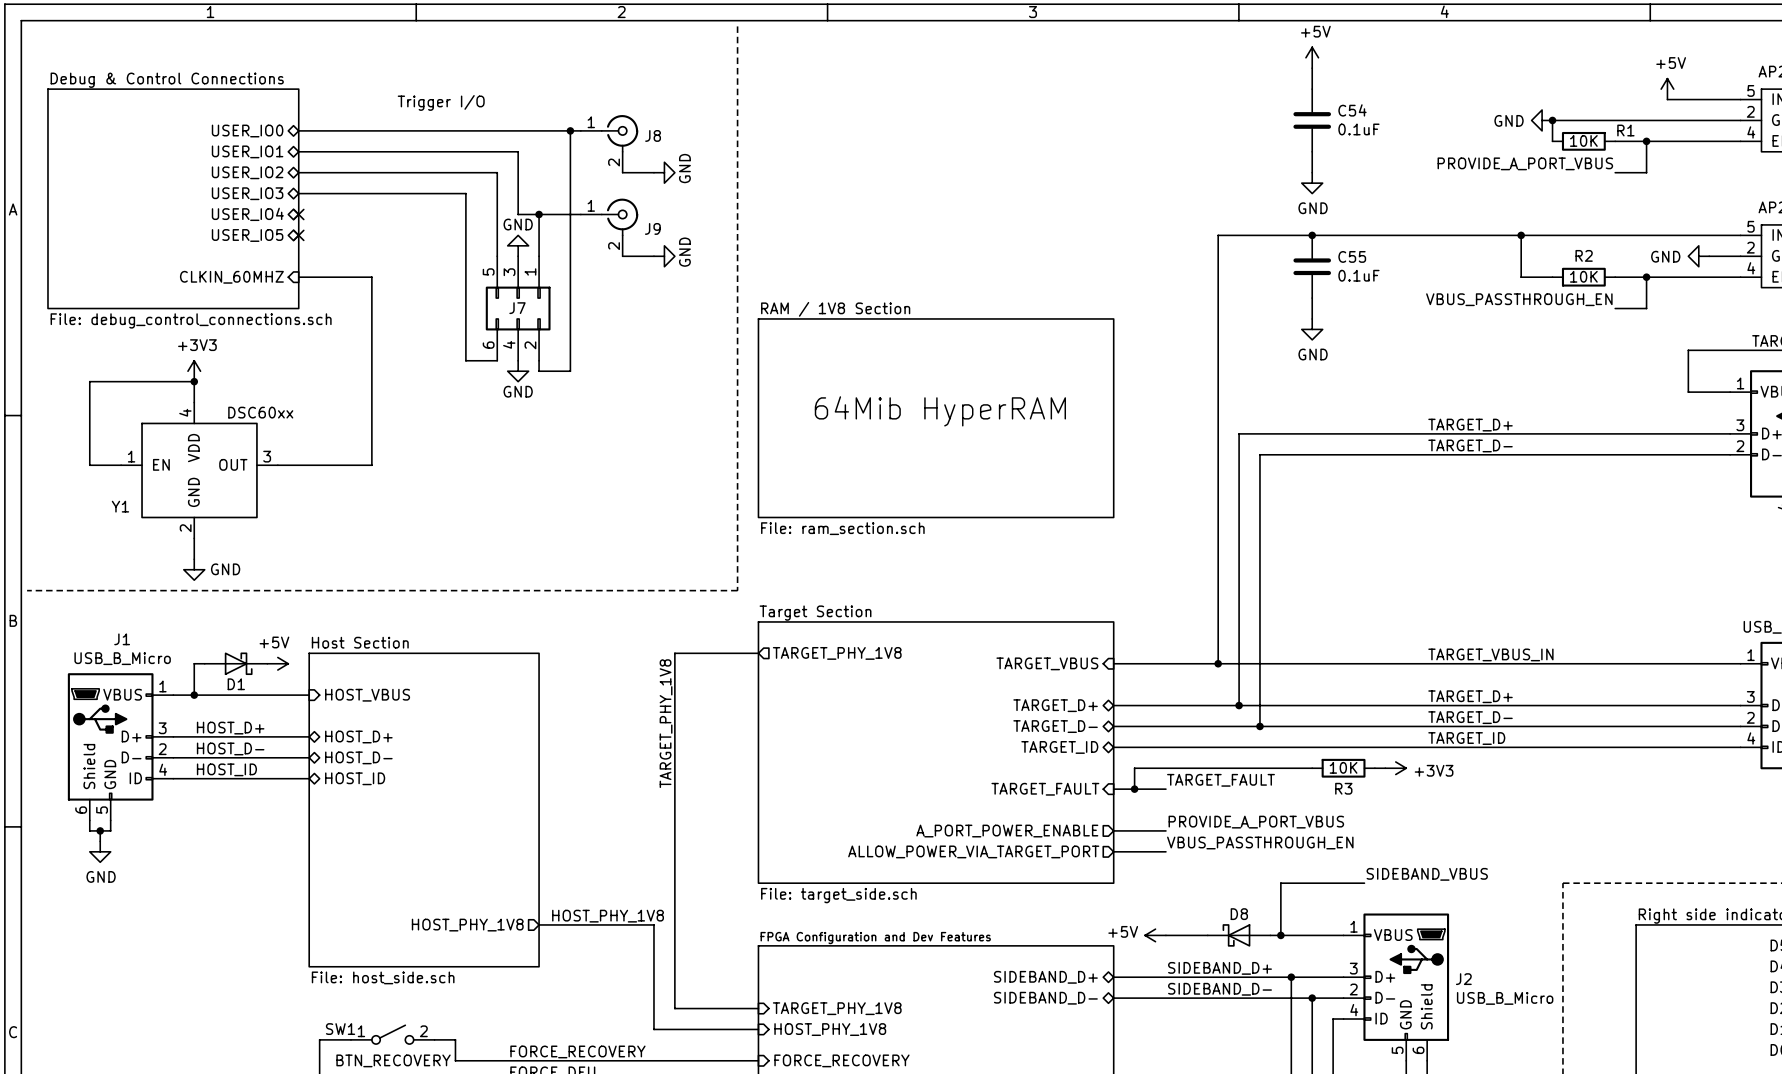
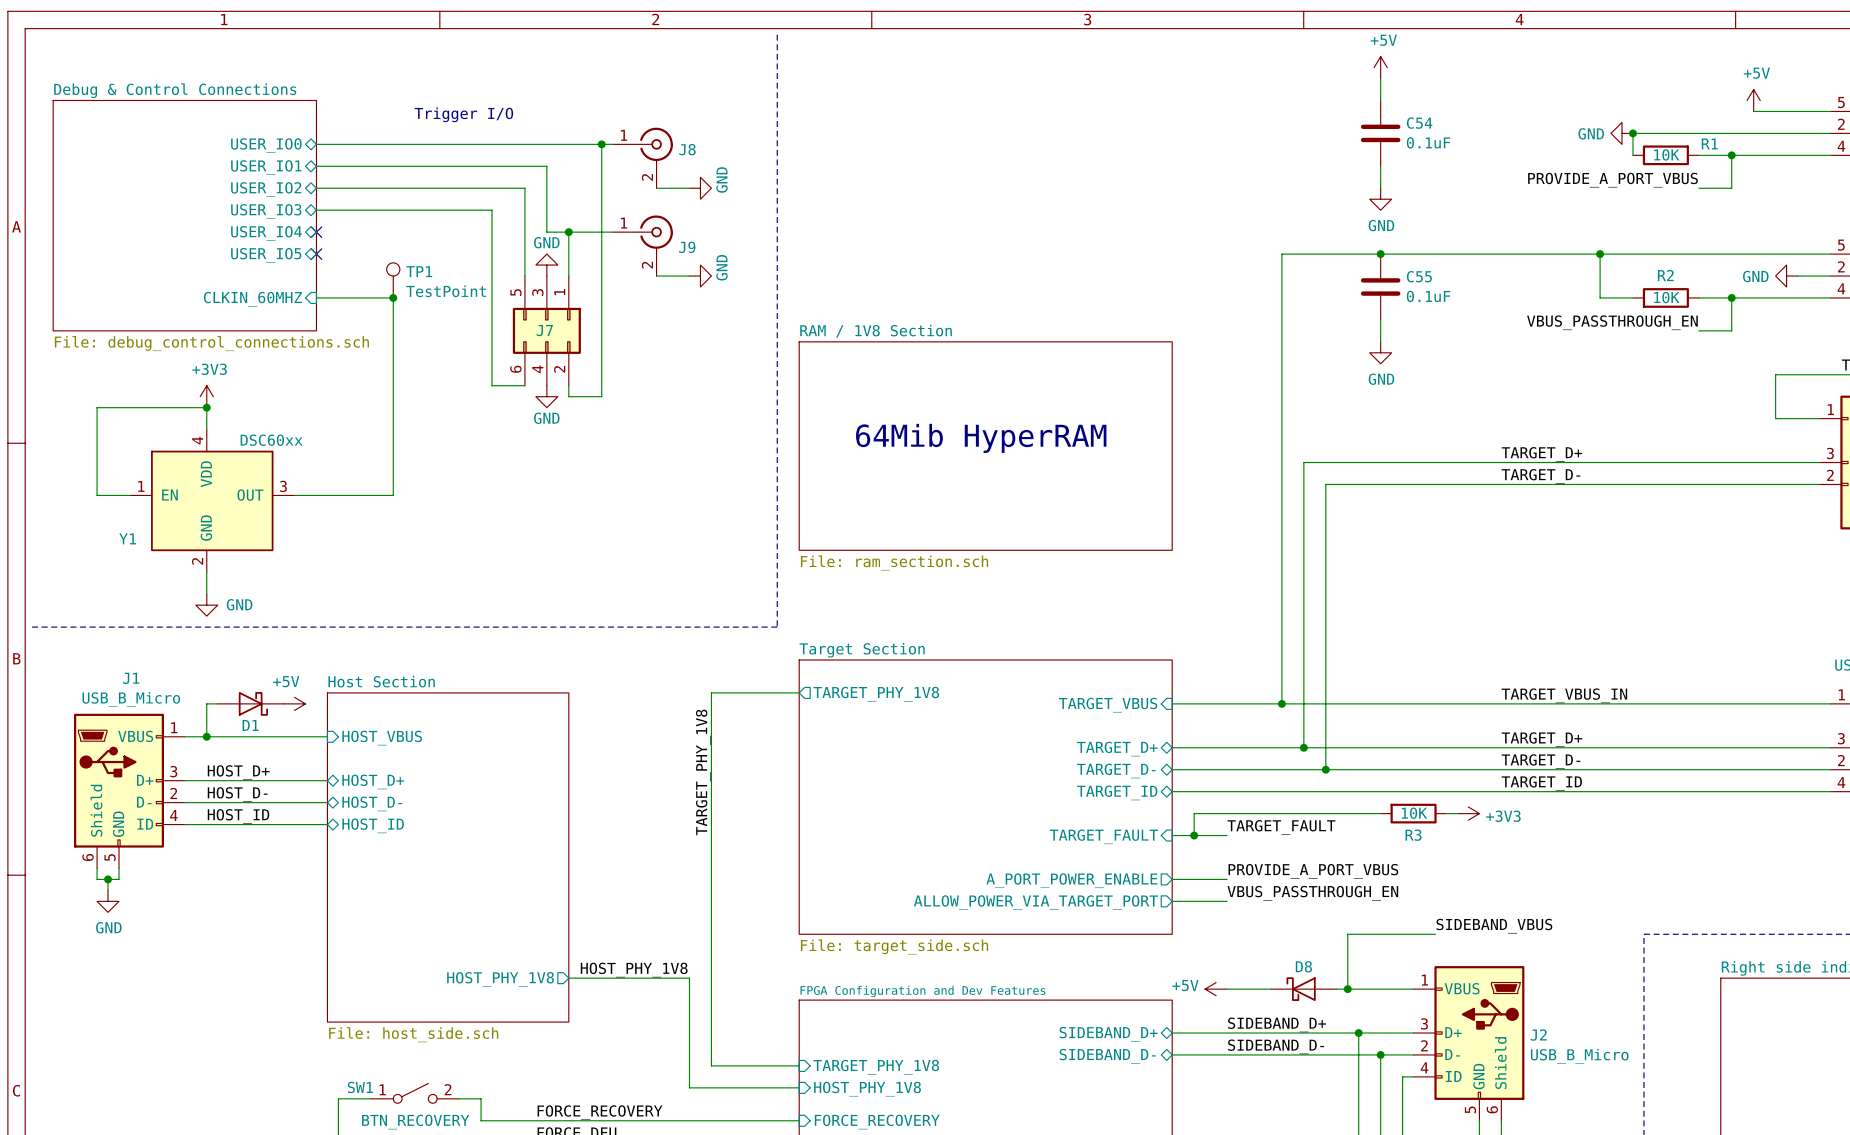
TP1: none -> TestPoint (393, 280)
junction: none -> (393, 297)

